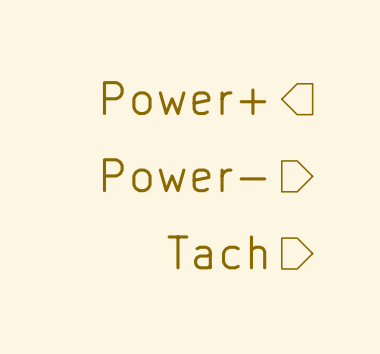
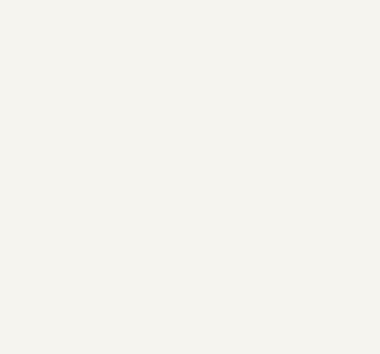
hierarchical label: Power+ (184, 98) -> none
hierarchical label: Power- (184, 175) -> none
hierarchical label: Tach (216, 252) -> none

